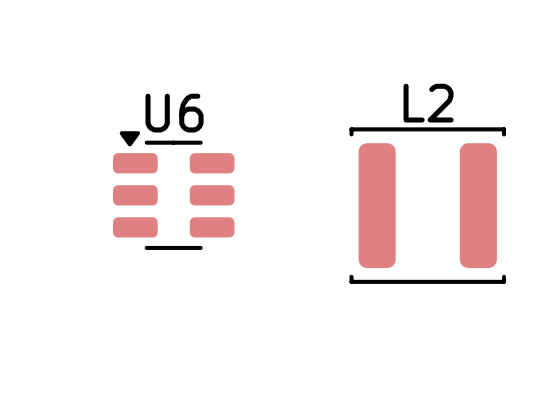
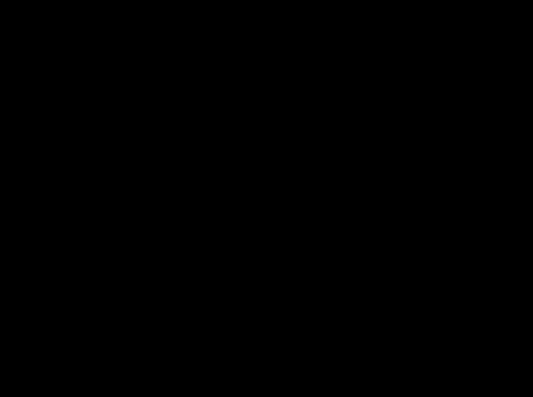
U6: (173, 190) -> none
L2: (427, 205) -> none

